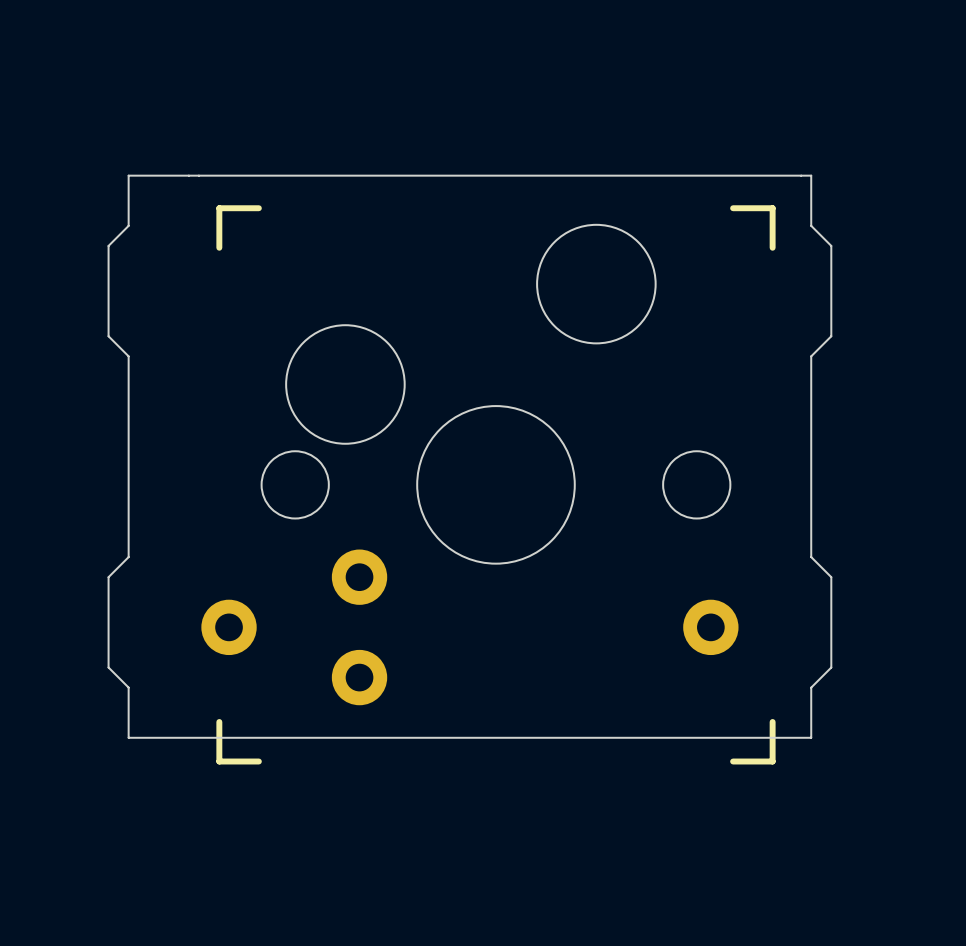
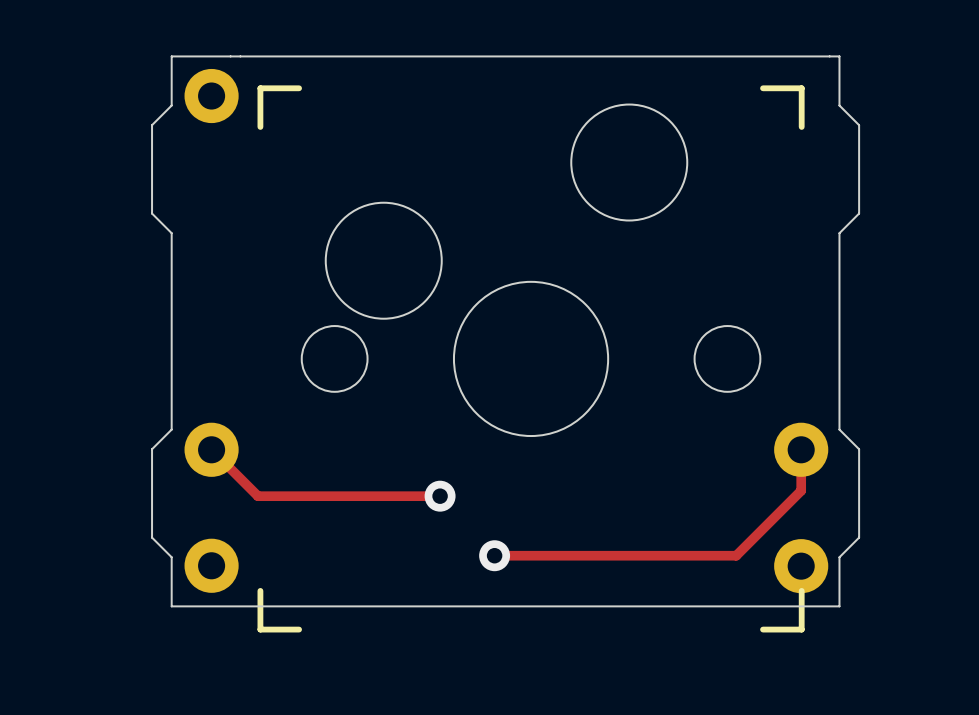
part: none -> (211, 96)
track: none -> (211, 449) (257, 496) (440, 496)
part: none -> (211, 449)
part: (359, 577) -> none
track: none -> (801, 449) (801, 490) (736, 555) (494, 555)
part: none -> (801, 449)
via: none -> (440, 496)
part: (229, 627) -> none
part: (710, 627) -> none
part: (359, 677) -> none
via: none -> (494, 555)
part: none -> (211, 565)
part: none -> (801, 566)

